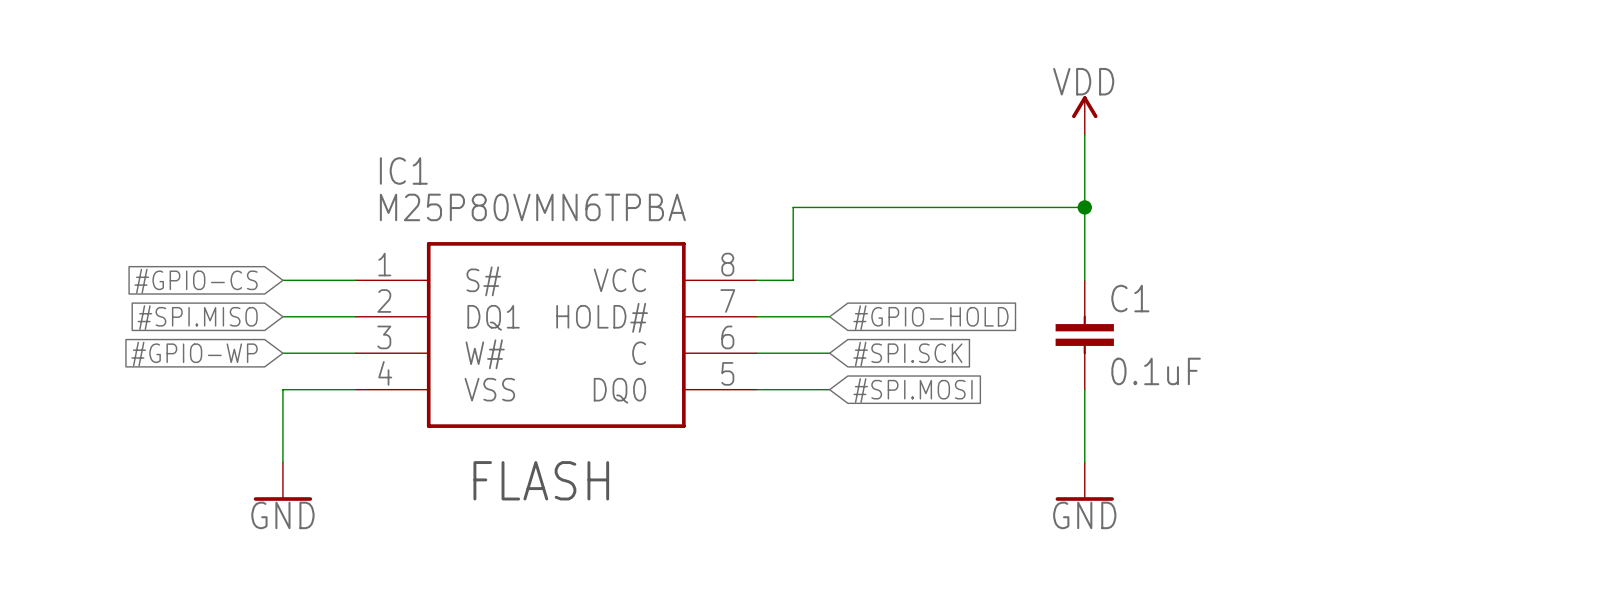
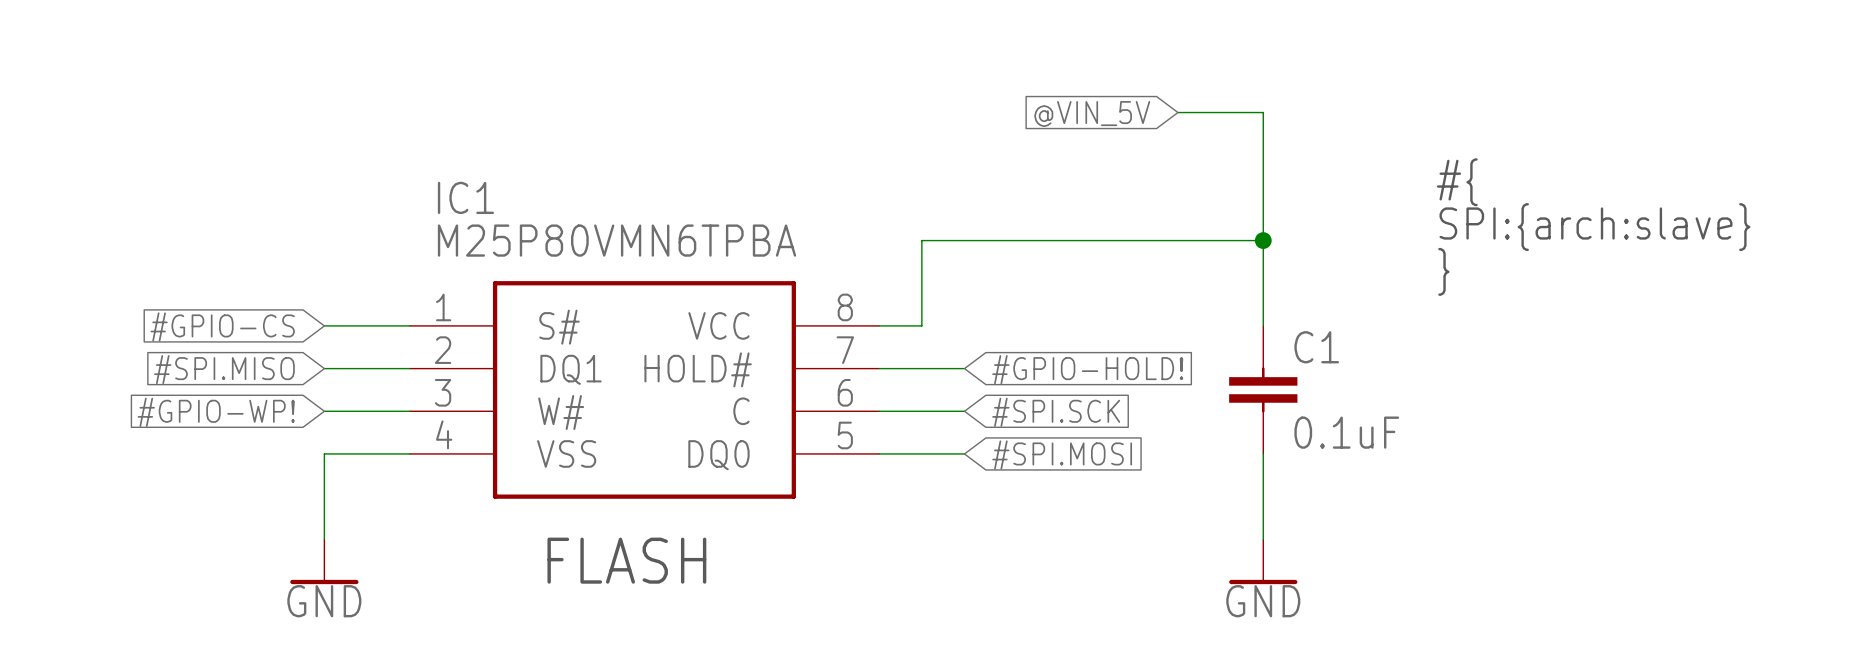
wire: none -> (1177, 112) (1263, 112) (1263, 155)
global label: none -> @VIN_5V (1092, 114)
power symbol: VDD (1084, 115) -> none
text: none -> #{ (1457, 182)
text: none -> SPI:{arch:slave} (1594, 227)
text: none -> } (1443, 271)
global label: #GPIO-HOLD (930, 317) -> #GPIO-HOLD! (1087, 369)
global label: #GPIO-WP (194, 354) -> #GPIO-WP! (216, 412)

